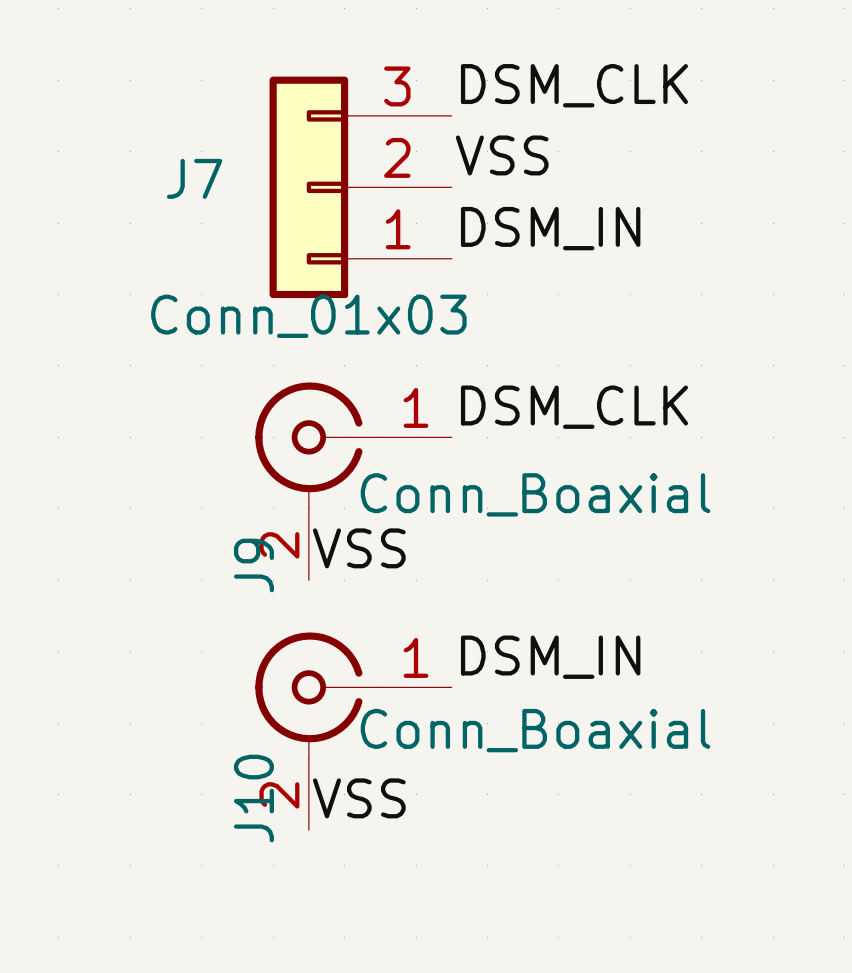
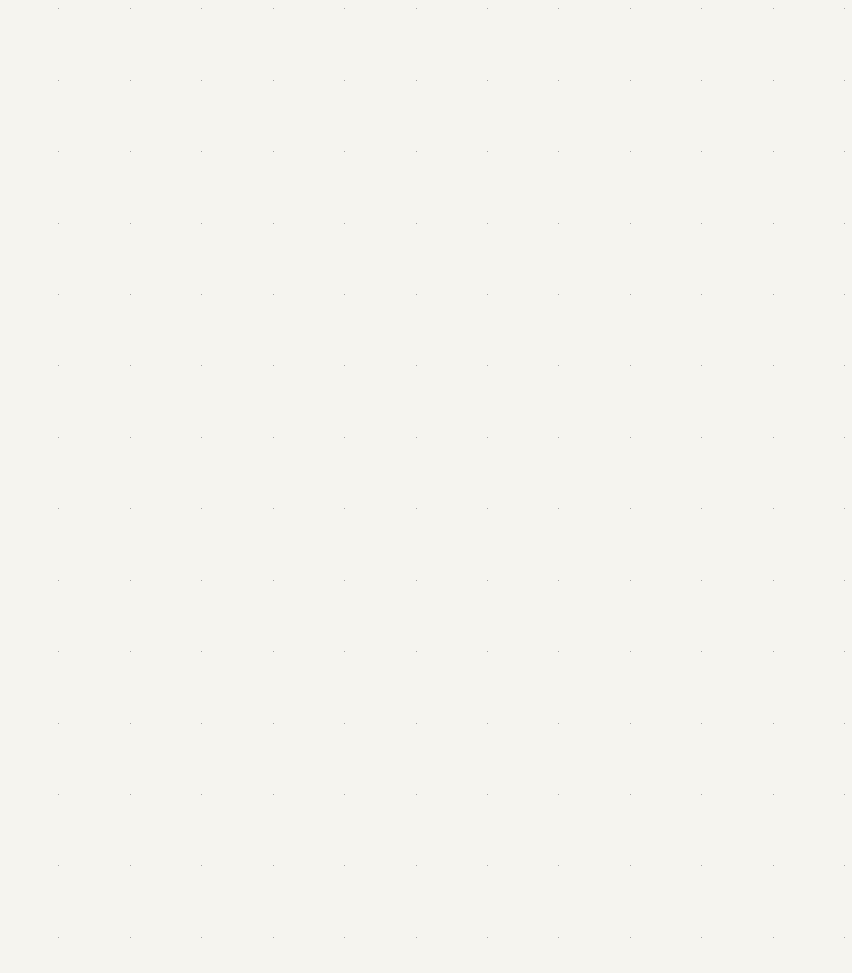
label: DSM_CLK (574, 85) -> none
label: VSS (502, 155) -> none
J7: Conn_01x03 (360, 187) -> none
label: DSM_IN (550, 228) -> none
label: DSM_CLK (574, 407) -> none
J9: Conn_Boaxial (353, 481) -> none
label: VSS (359, 548) -> none
label: DSM_IN (550, 657) -> none
J10: Conn_Boaxial (353, 731) -> none
label: VSS (359, 798) -> none

